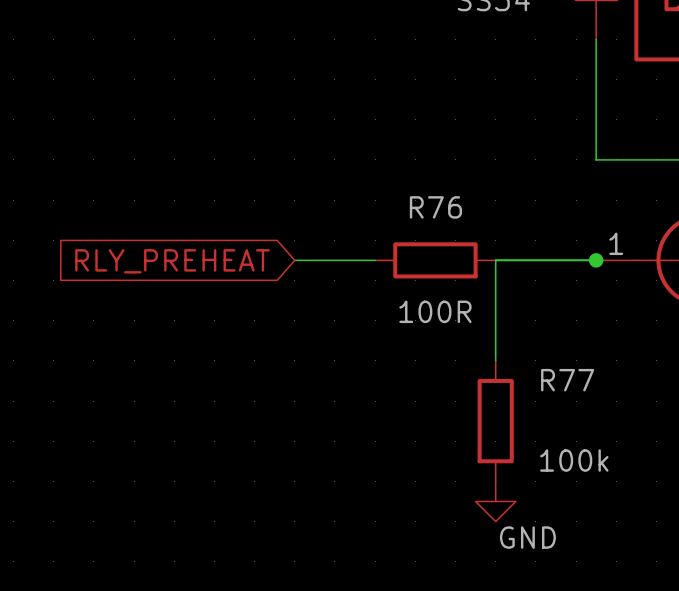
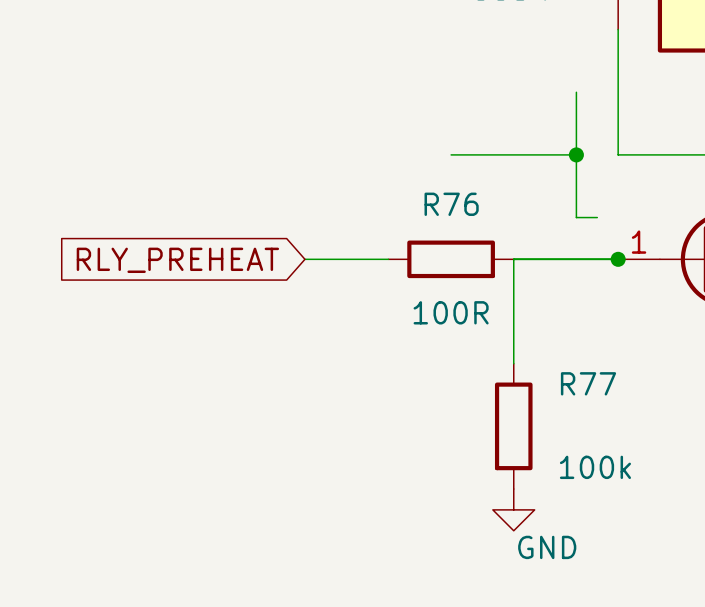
wire: none -> (576, 92) (576, 217) (597, 217)
wire: none -> (451, 154) (576, 154)
junction: none -> (576, 154)

